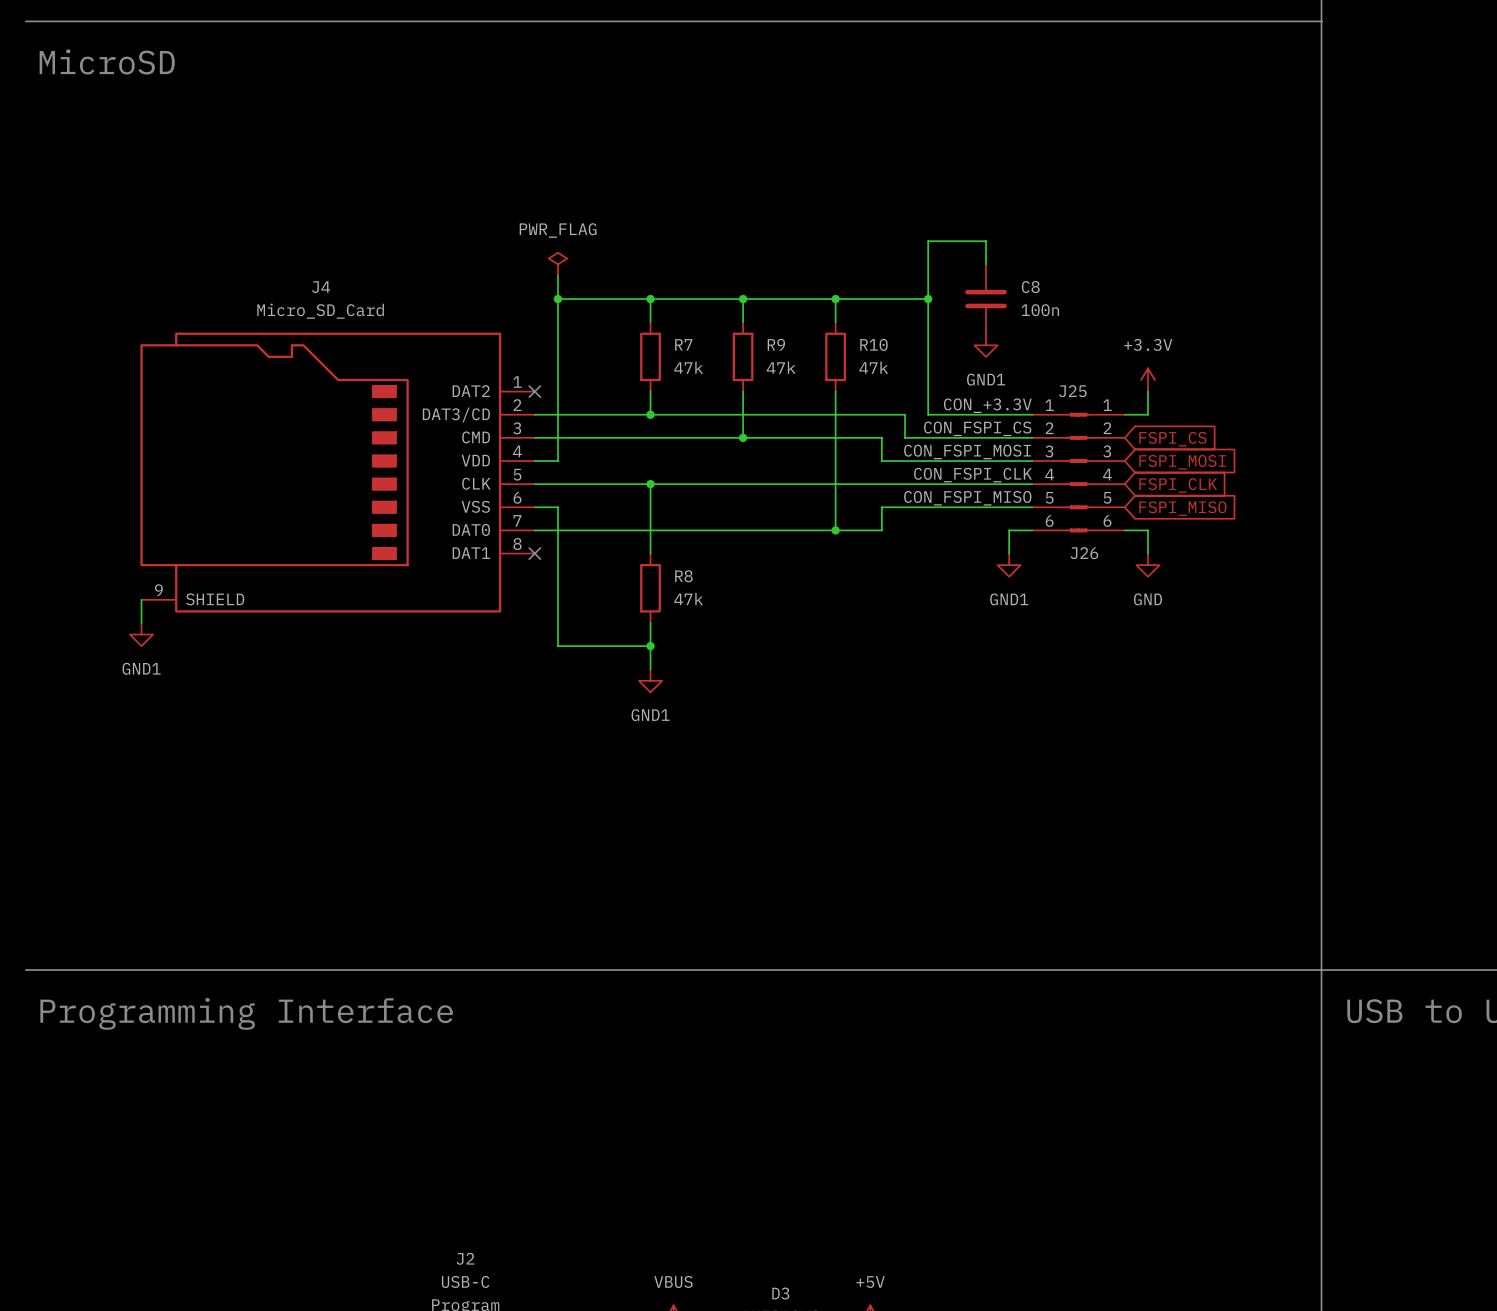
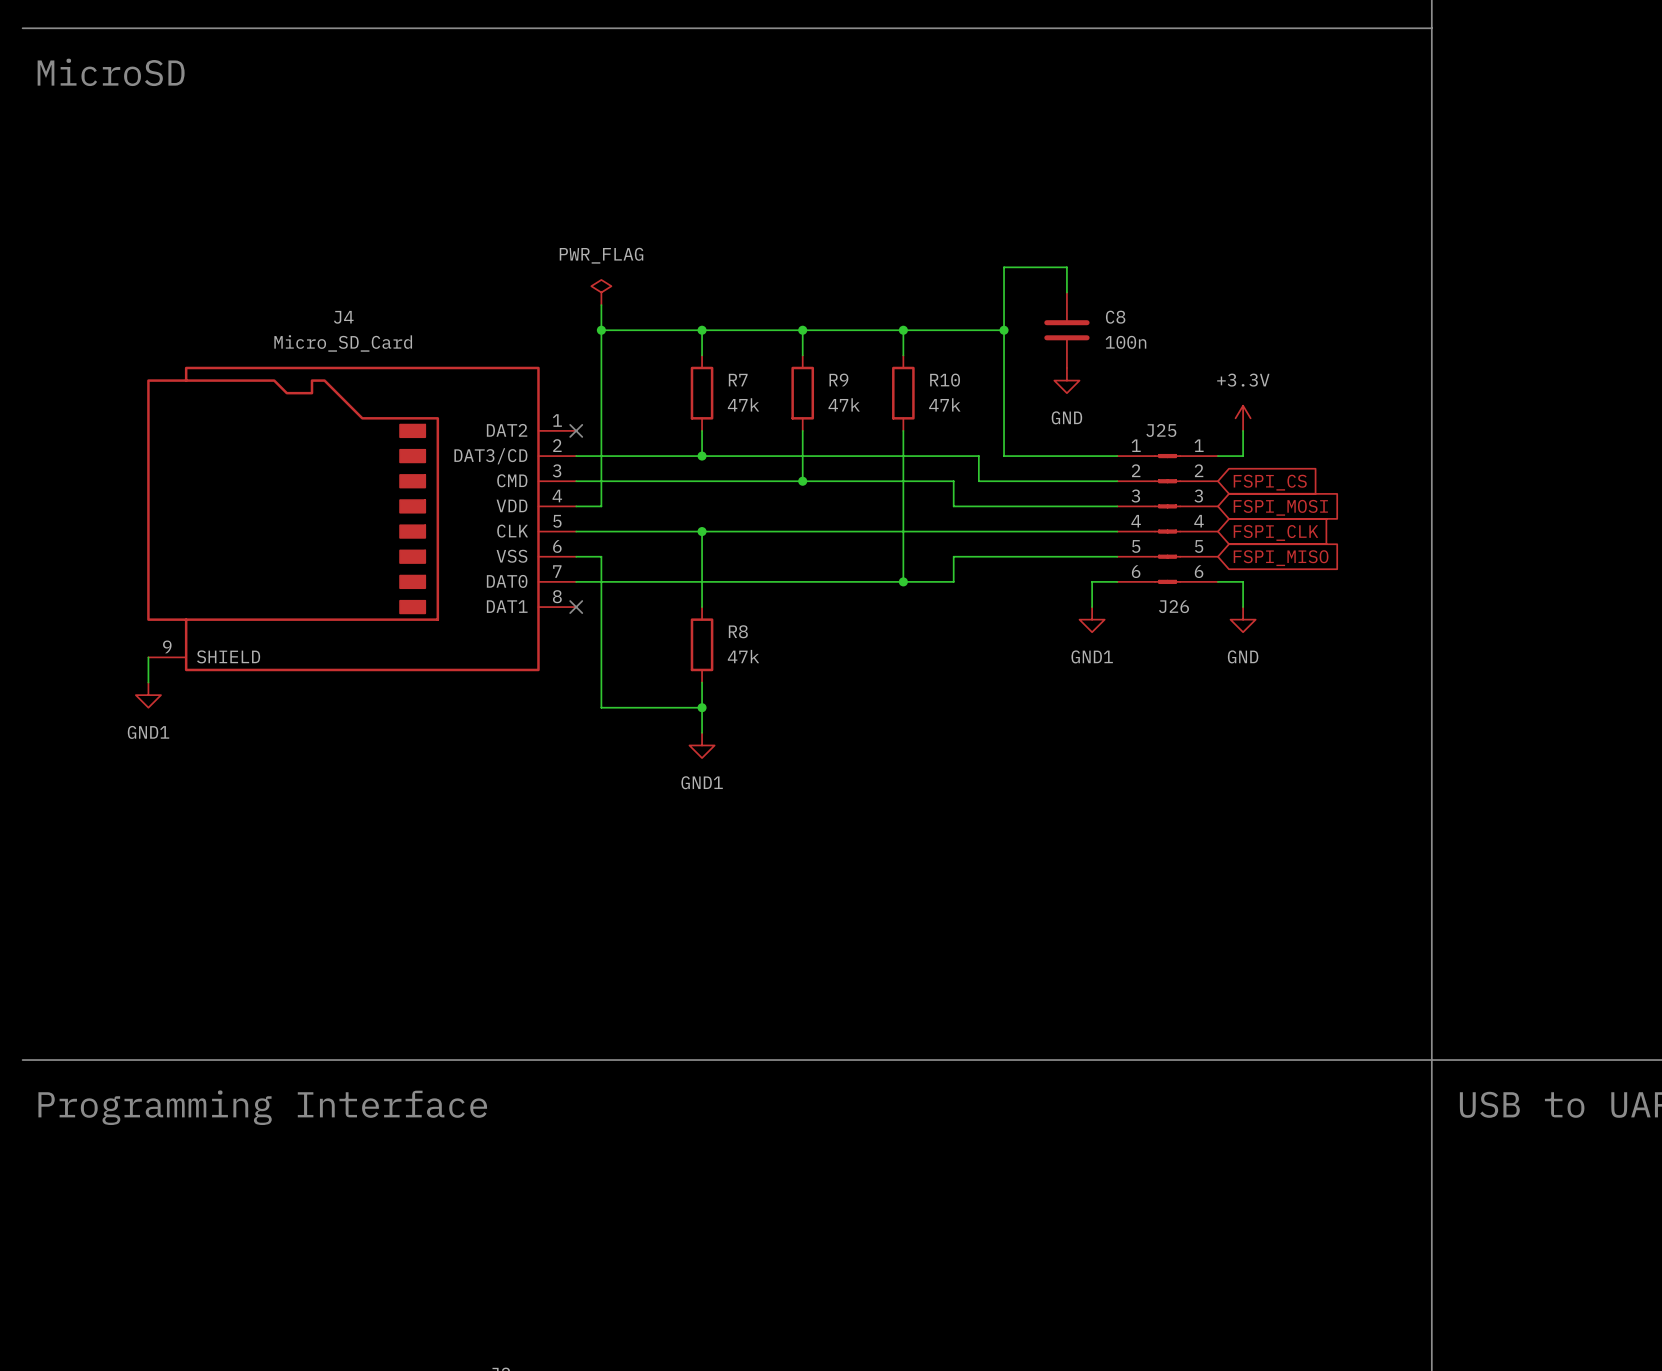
power symbol: GND1 (986, 345) -> GND (1066, 380)
label: CON_+3.3V (987, 405) -> none
label: CON_FSPI_CS (977, 428) -> none
label: CON_FSPI_MOSI (967, 451) -> none
label: CON_FSPI_CLK (973, 475) -> none
label: CON_FSPI_MISO (967, 498) -> none

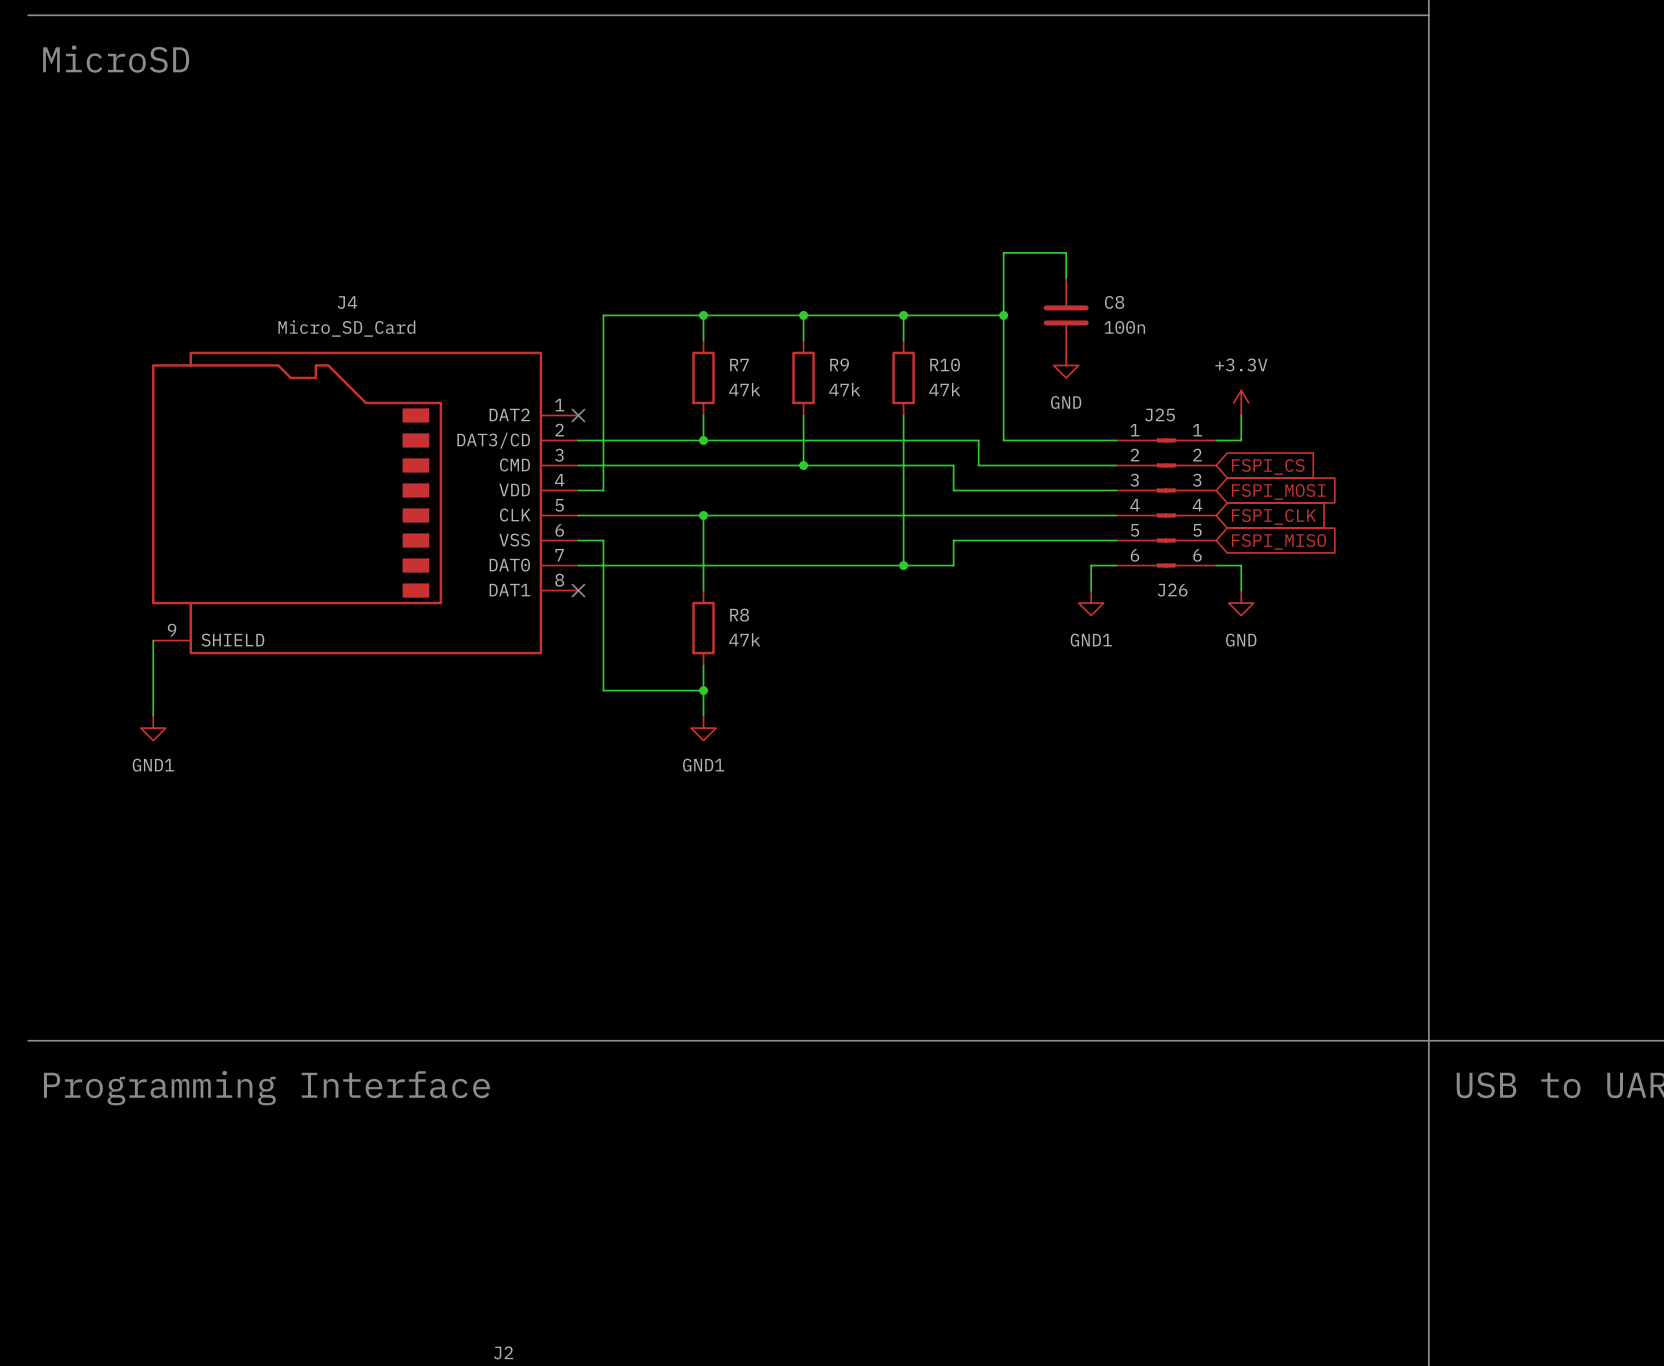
power symbol: PWR_FLAG (601, 292) -> none
wire: (601, 305) (601, 330) -> none
junction: (601, 330) -> none
wire: none -> (153, 665) (153, 715)
power symbol position: GND1 (148, 695) -> GND1 (153, 728)

